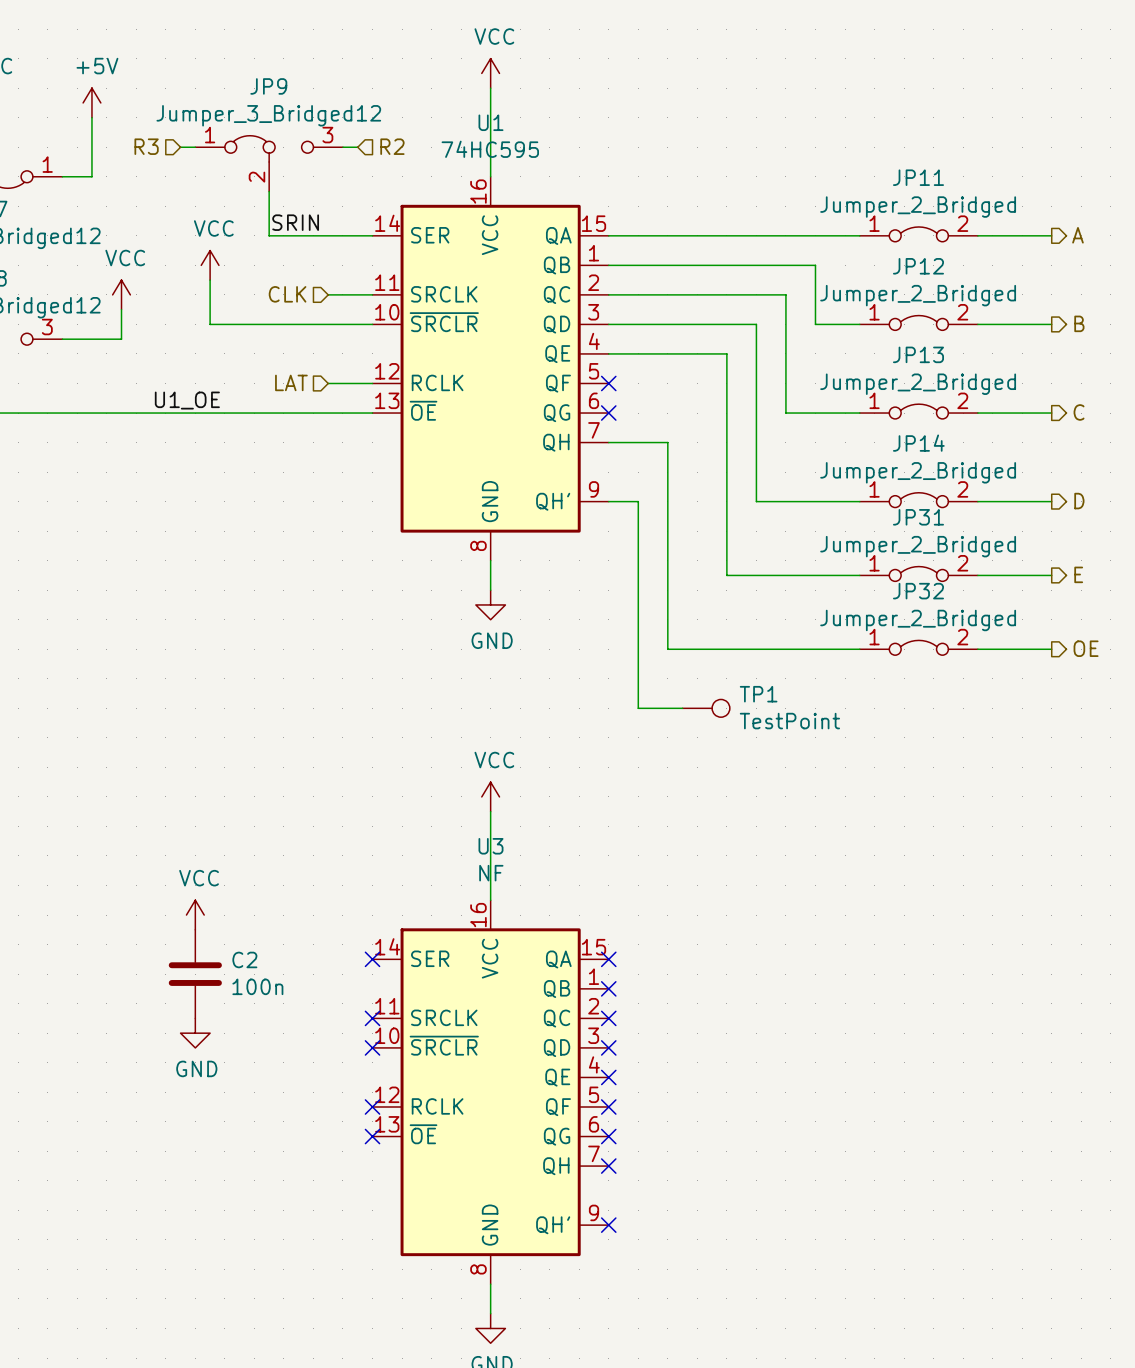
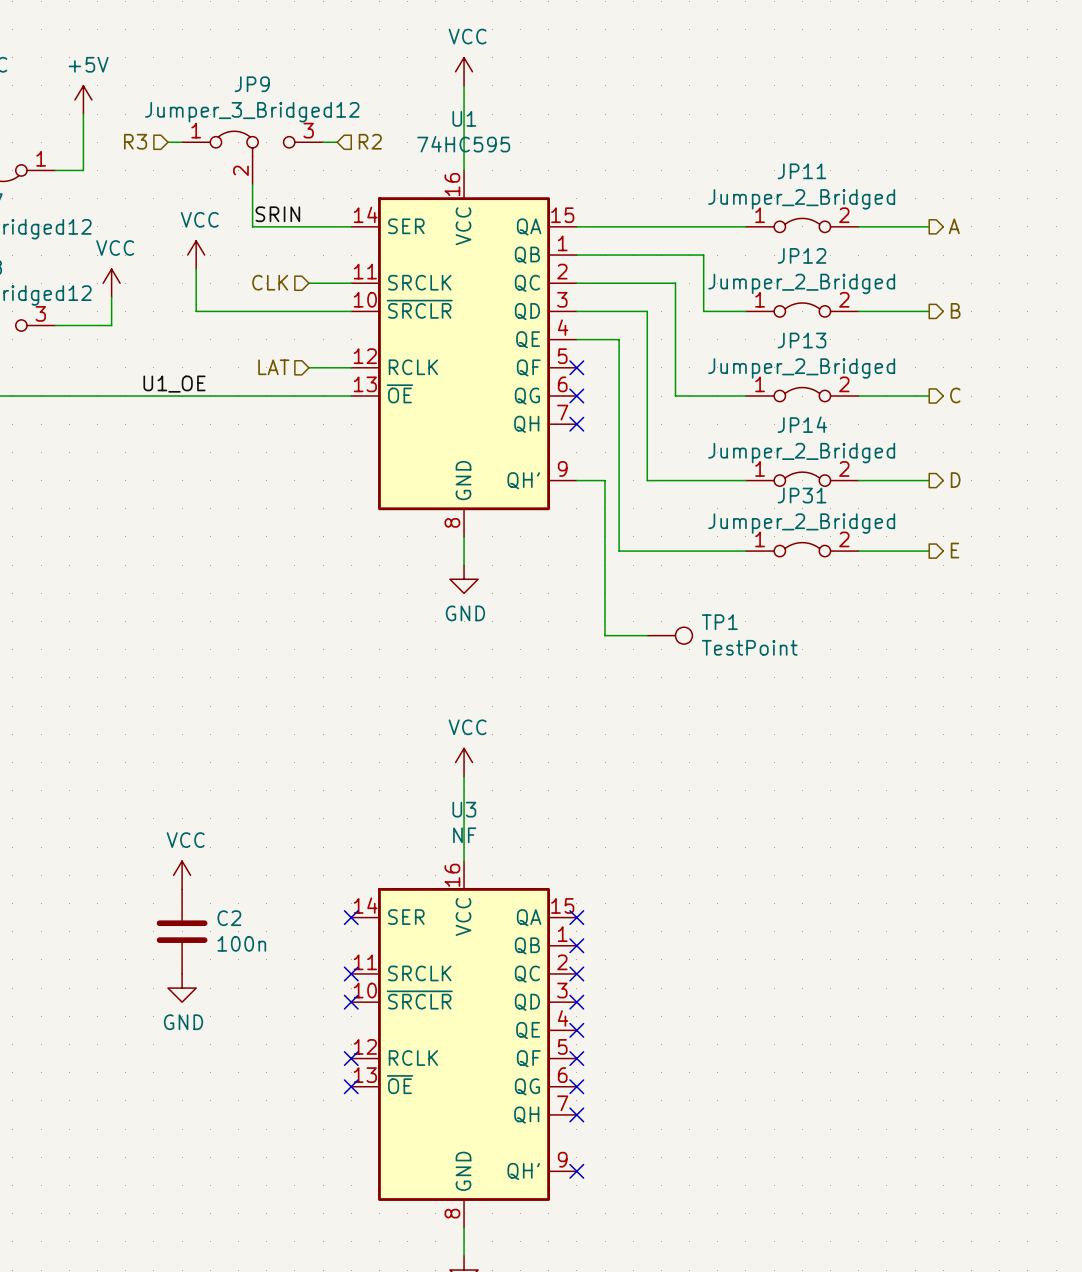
JP11 position: (918, 234) -> (802, 225)
wire: (785, 235) (859, 235) -> none
wire: (977, 235) (1051, 235) -> (929, 226) (858, 226)
hierarchical label position: A (1077, 235) -> A (954, 226)
wire: (741, 265) (815, 265) (815, 324) (859, 324) -> none
wire: (712, 294) (785, 294) (785, 413) (859, 413) -> (675, 283) (675, 396) (745, 396)
JP12 position: (918, 322) -> (802, 310)
hierarchical label position: B (1079, 323) -> B (955, 310)
wire: (682, 324) (741, 324) -> (703, 255) (703, 311)
wire: (756, 324) (756, 501) -> (647, 311) (647, 480) (717, 480)
wire: none -> (717, 311) (745, 311)
wire: (977, 324) (1051, 324) -> (929, 311) (858, 311)
wire: (653, 353) (726, 353) (726, 575) -> (619, 339) (619, 551) (689, 551)
JP13 position: (918, 411) -> (802, 394)
hierarchical label position: C (1079, 412) -> C (955, 395)
wire: (977, 413) (1051, 413) -> (929, 396) (858, 396)
wire: (608, 442) (667, 442) (667, 649) (859, 649) -> none
no-connect mark: none -> (576, 424)
JP14 position: (918, 500) -> (802, 479)
wire: (785, 501) (859, 501) -> none
wire: (977, 501) (1051, 501) -> (929, 480) (858, 480)
hierarchical label position: D (1079, 501) -> D (955, 480)
JP31 position: (918, 573) -> (802, 549)
hierarchical label position: E (1078, 574) -> E (954, 550)
wire: (785, 575) (859, 575) -> none
wire: (977, 575) (1051, 575) -> (929, 551) (858, 551)
JP32: Jumper_2_Bridged (918, 647) -> none
hierarchical label: OE (1086, 648) -> none
wire: (977, 649) (1051, 649) -> none
wire: (638, 664) (638, 708) (682, 708) -> (605, 635) (647, 635)
TP1 position: (706, 708) -> (669, 635)

